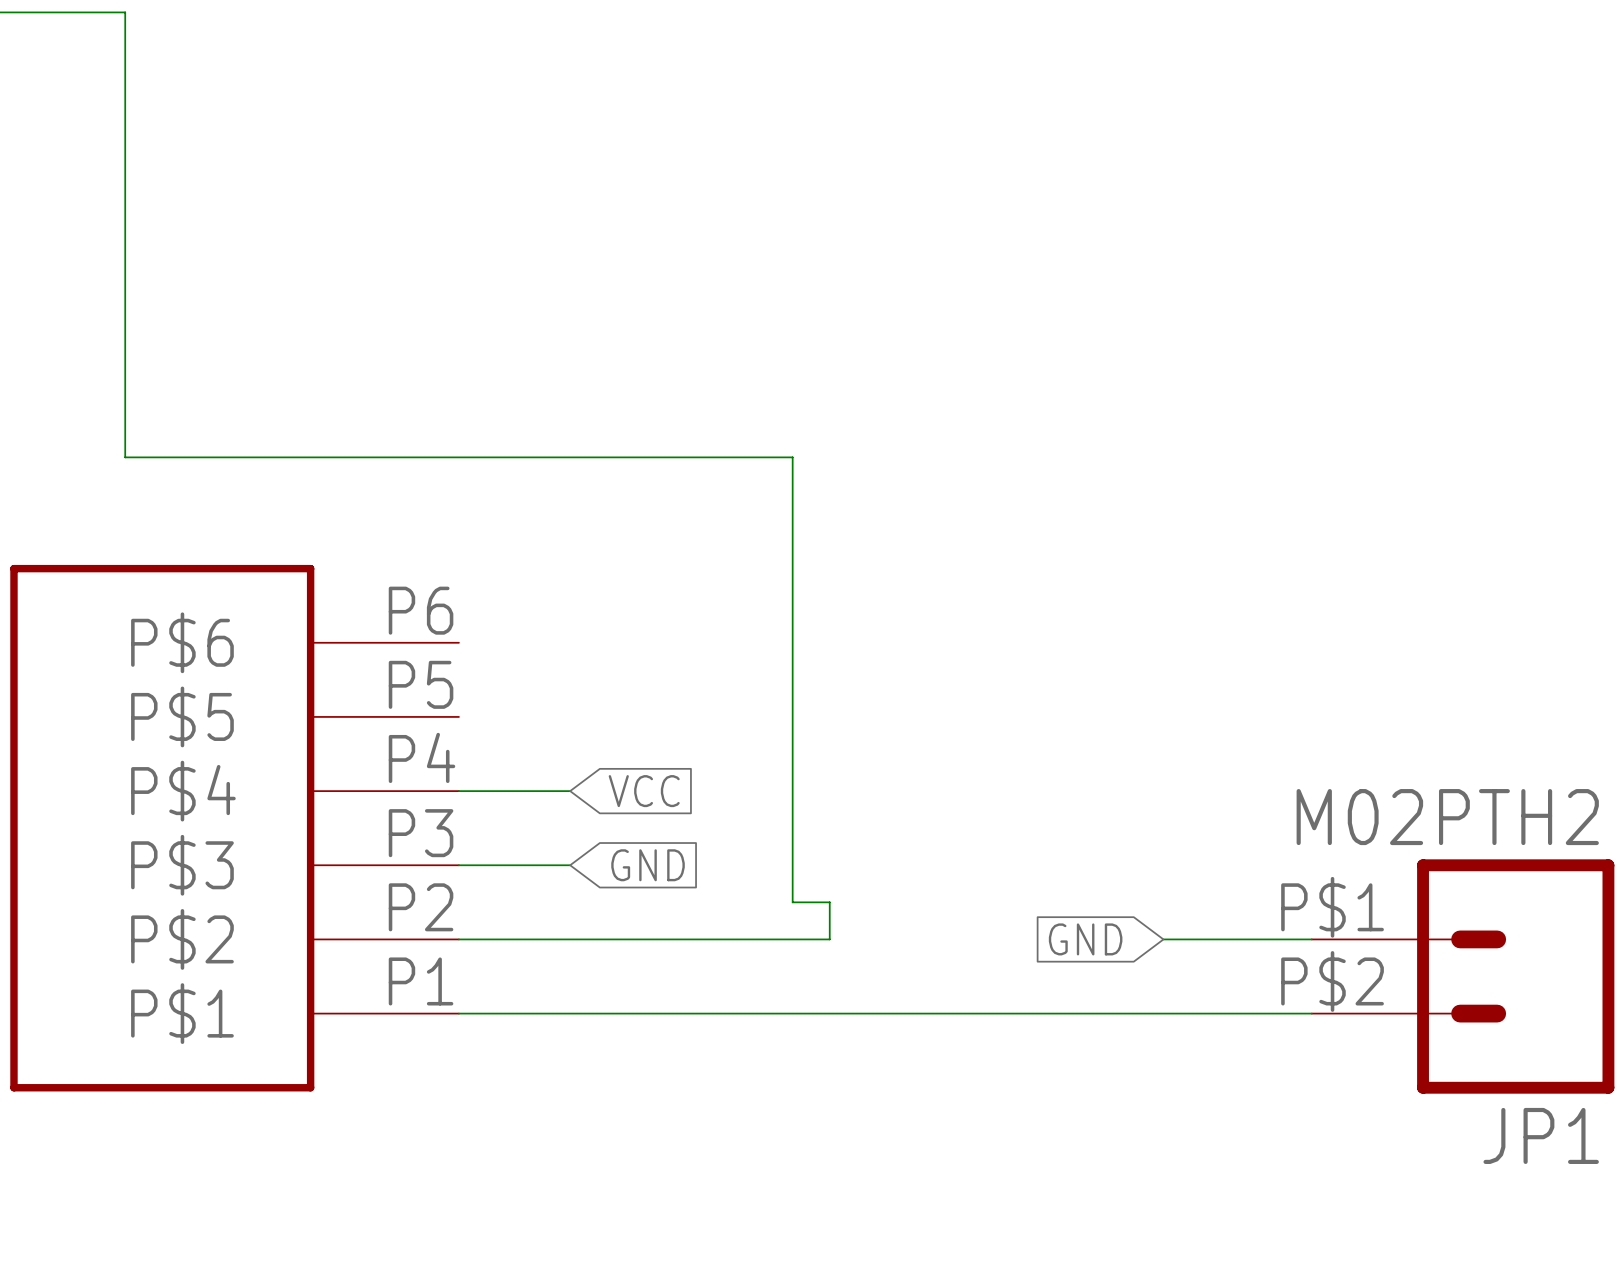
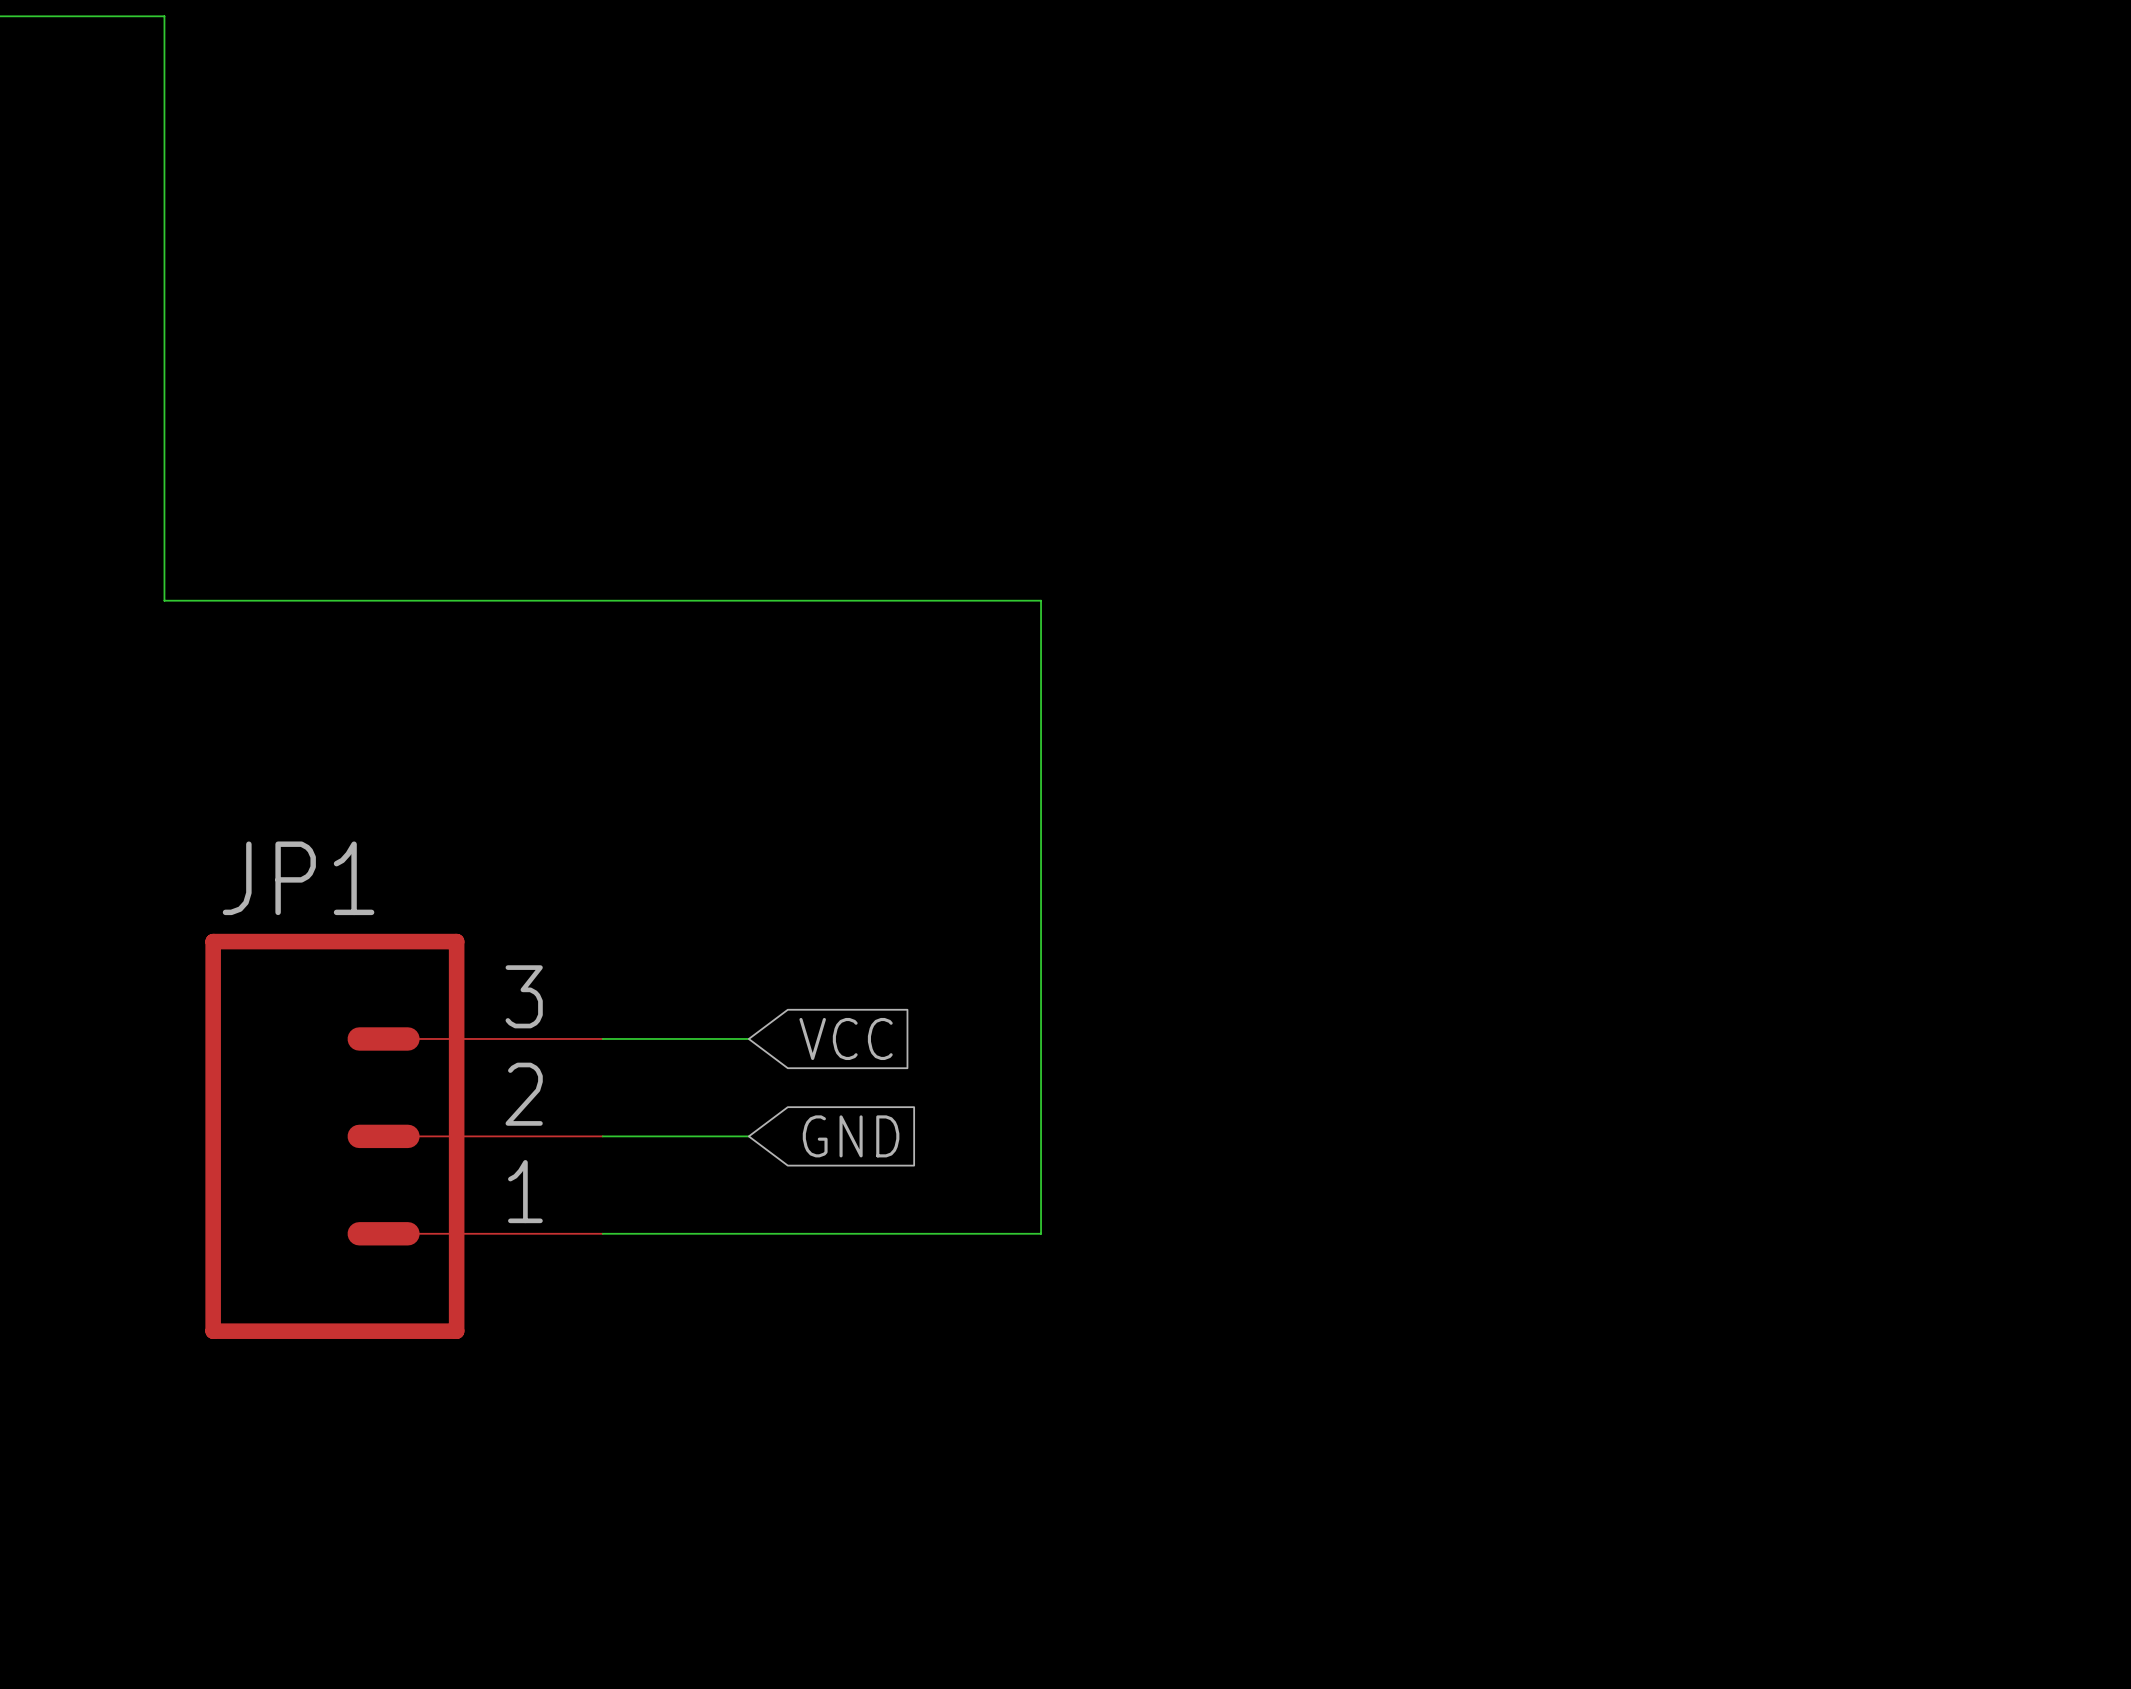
JP1 value: M02PTH2 (1447, 817) -> none
part: (234, 828) -> none
JP1 symbol: [1311, 859, 1615, 1094] -> [205, 933, 603, 1339]
wire: (792, 902) (829, 902) (829, 939) (792, 939) -> (1041, 1185) (1041, 1233)
global label: GND (1085, 939) -> none
wire: (1163, 939) (1311, 939) -> none
wire: (458, 1013) (1311, 1013) -> none
JP1 name position: JP1 (1541, 1135) -> JP1 (298, 878)

